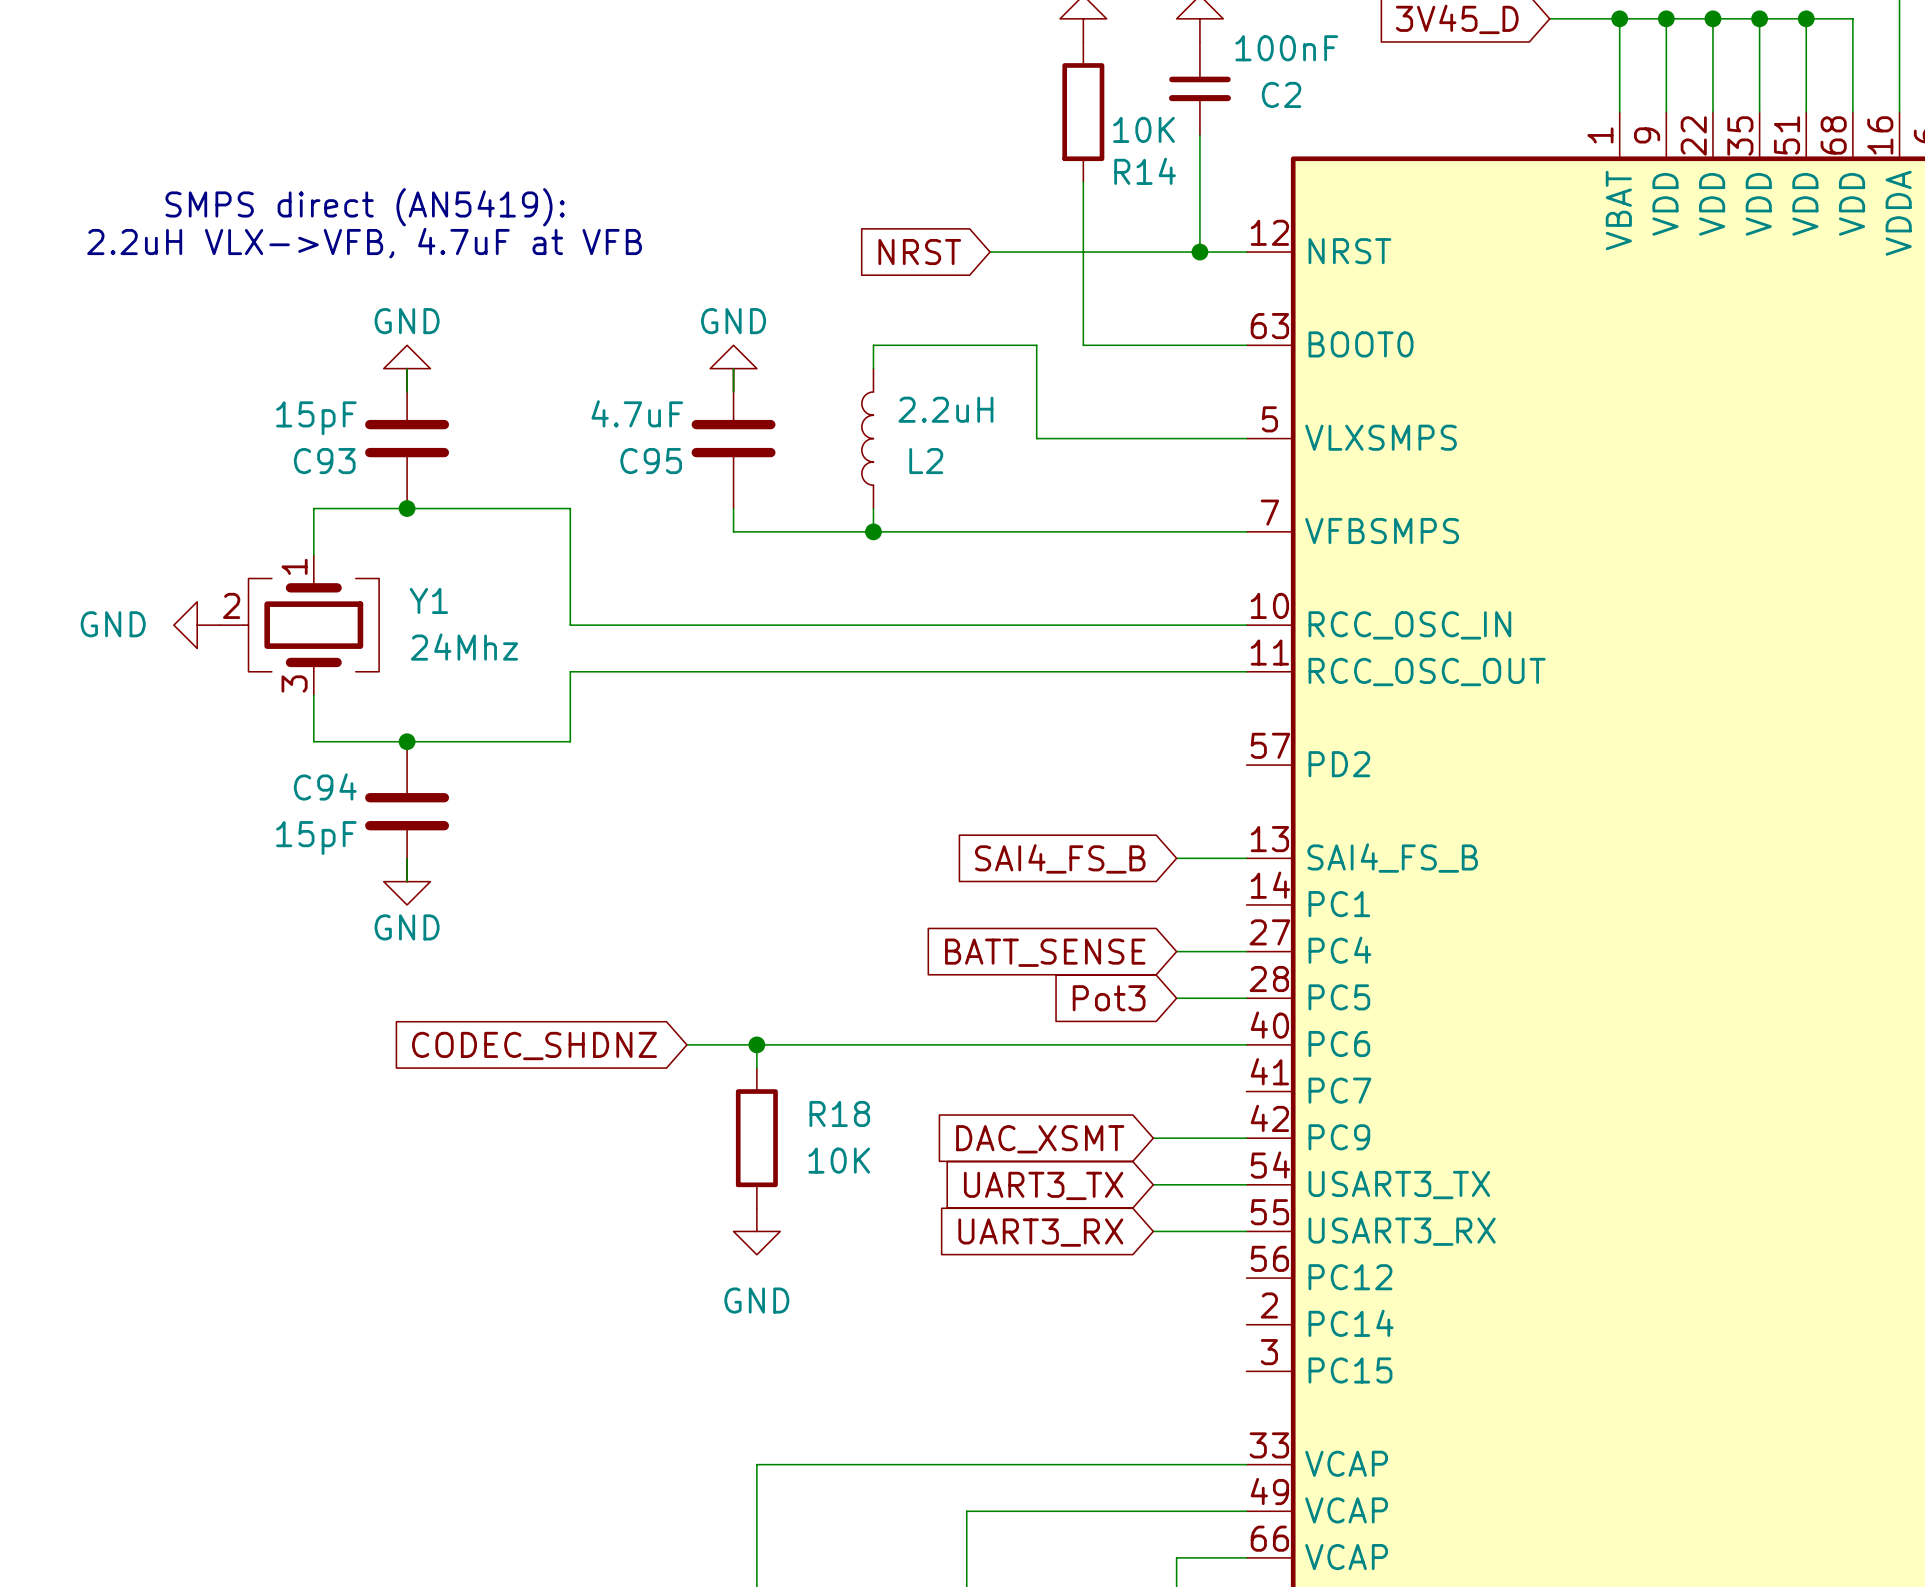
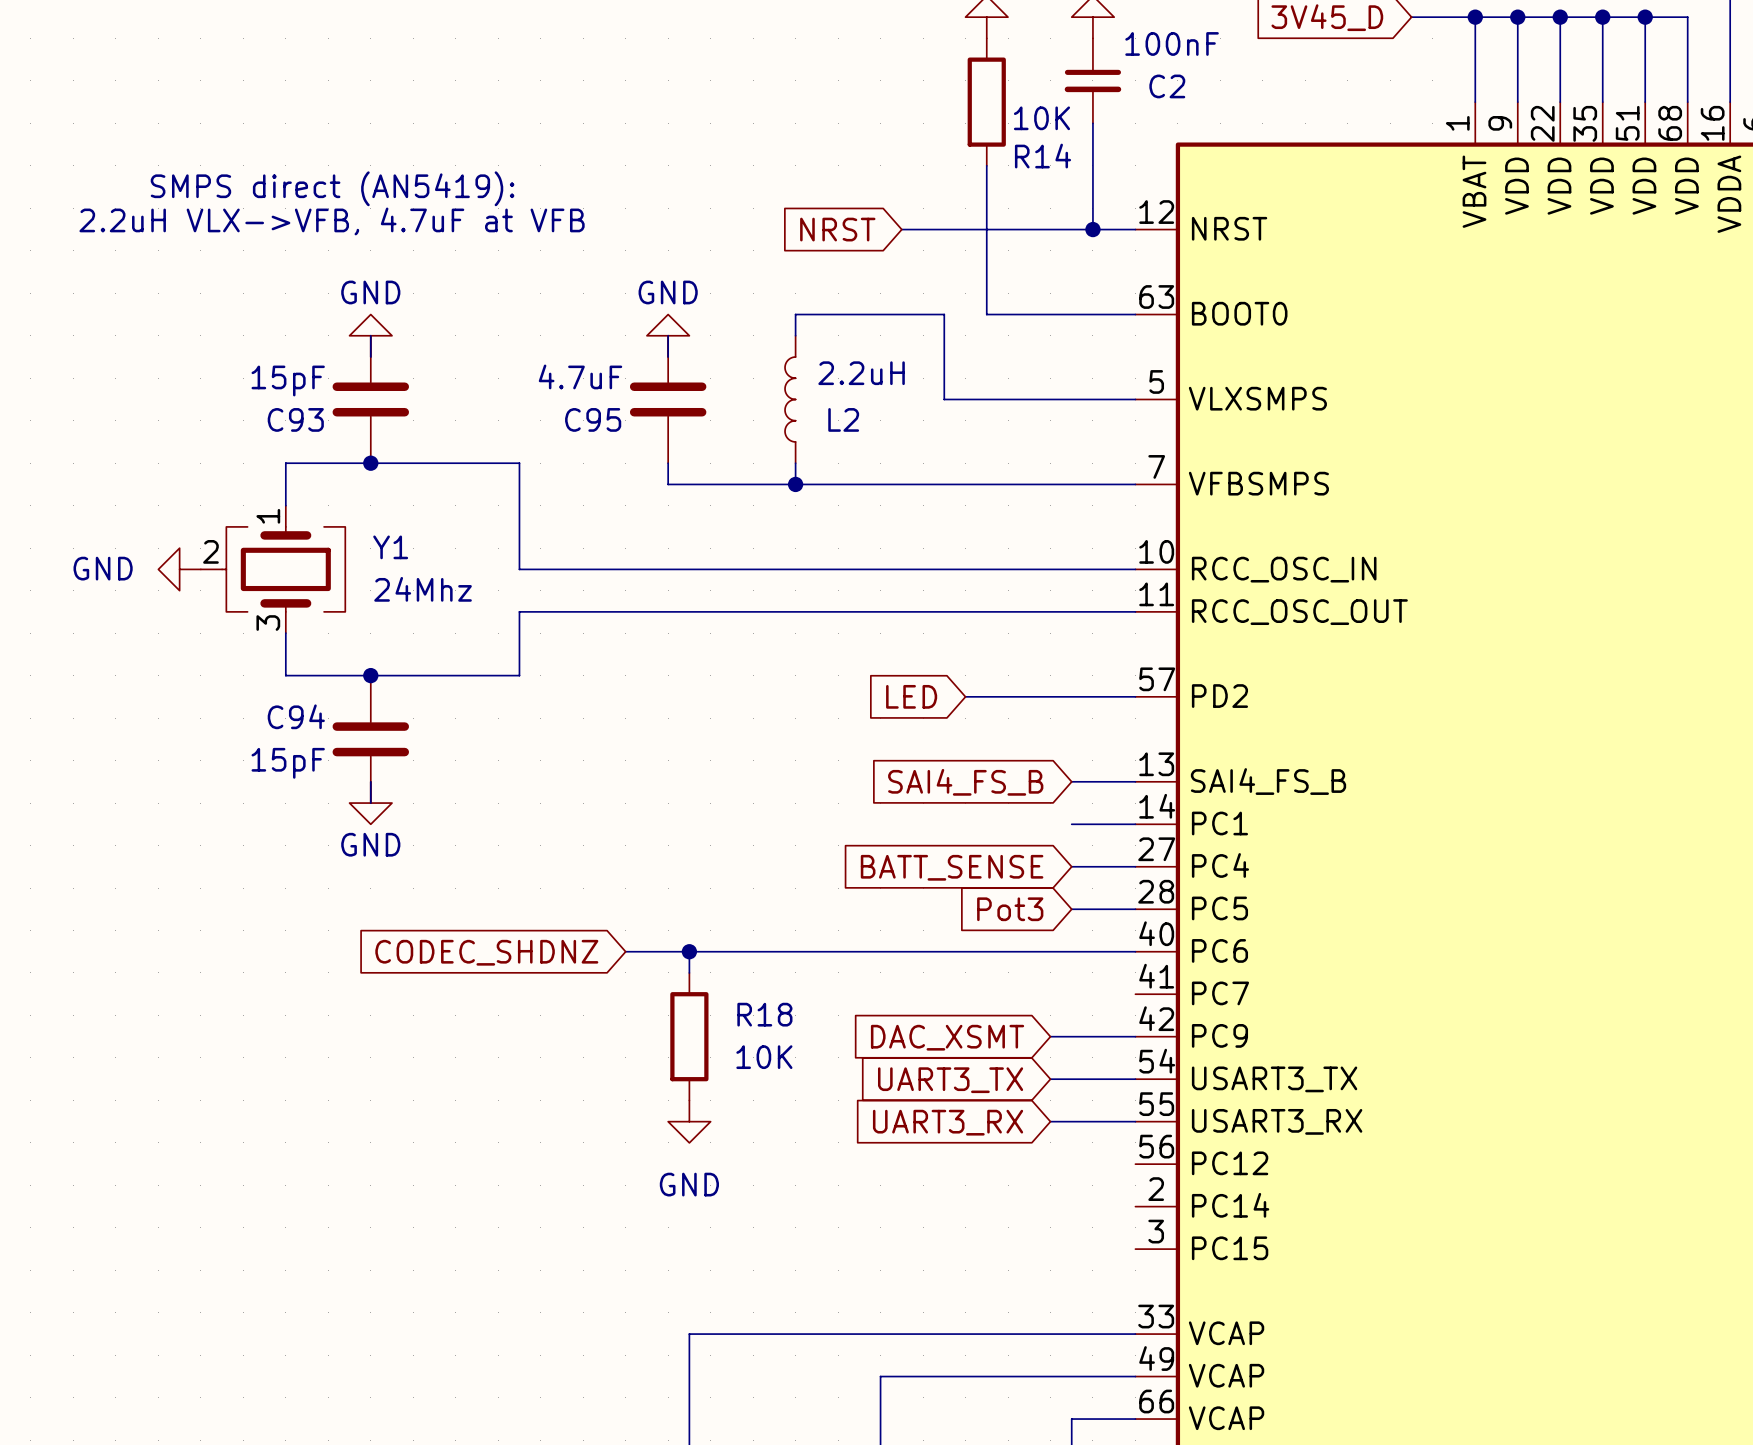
global label: none -> LED (911, 696)
wire: none -> (965, 696) (1135, 696)
wire: none -> (1071, 824) (1135, 824)

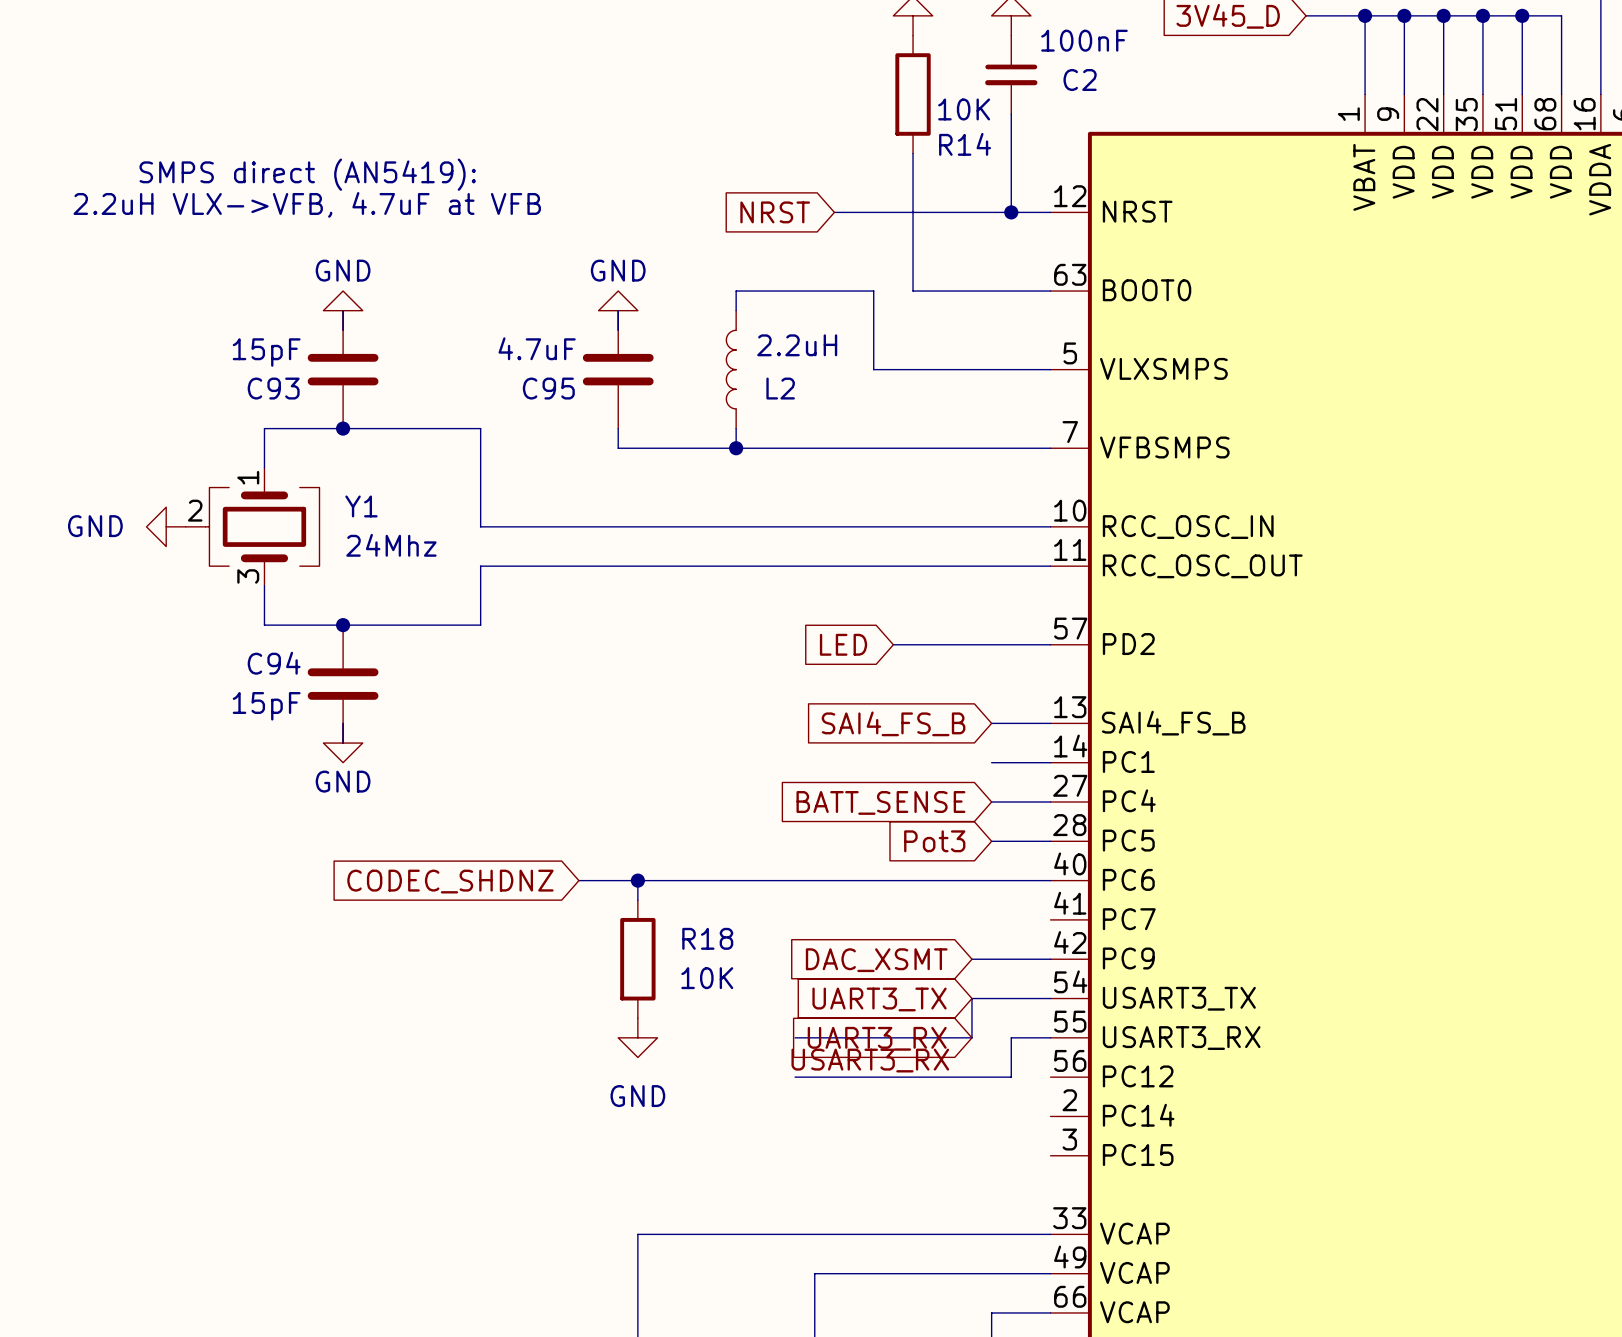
wire: none -> (971, 998) (971, 1037) (795, 1037)
wire: (1050, 1121) (1092, 1121) -> (795, 1077) (1011, 1077) (1011, 1037)
label: none -> USART3_RX (870, 1060)

